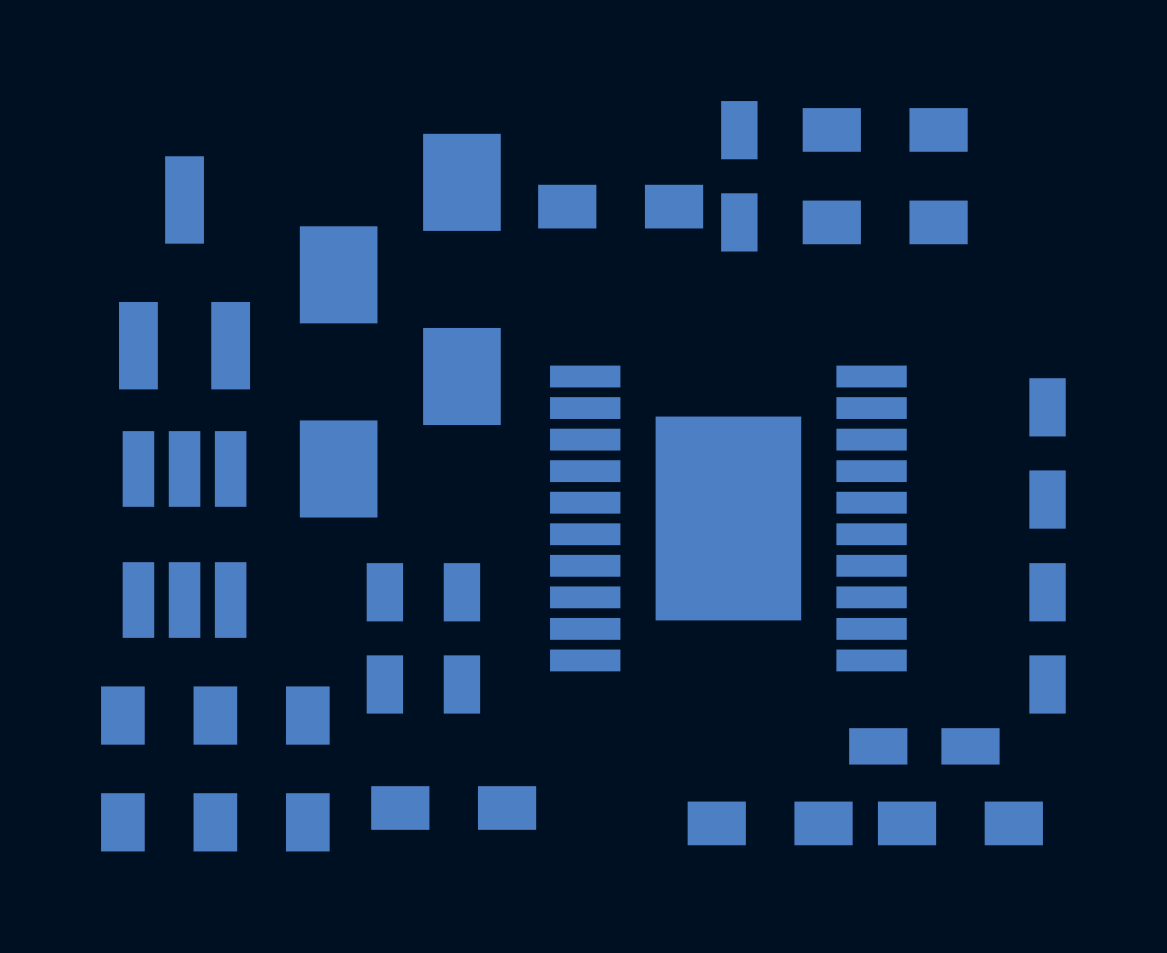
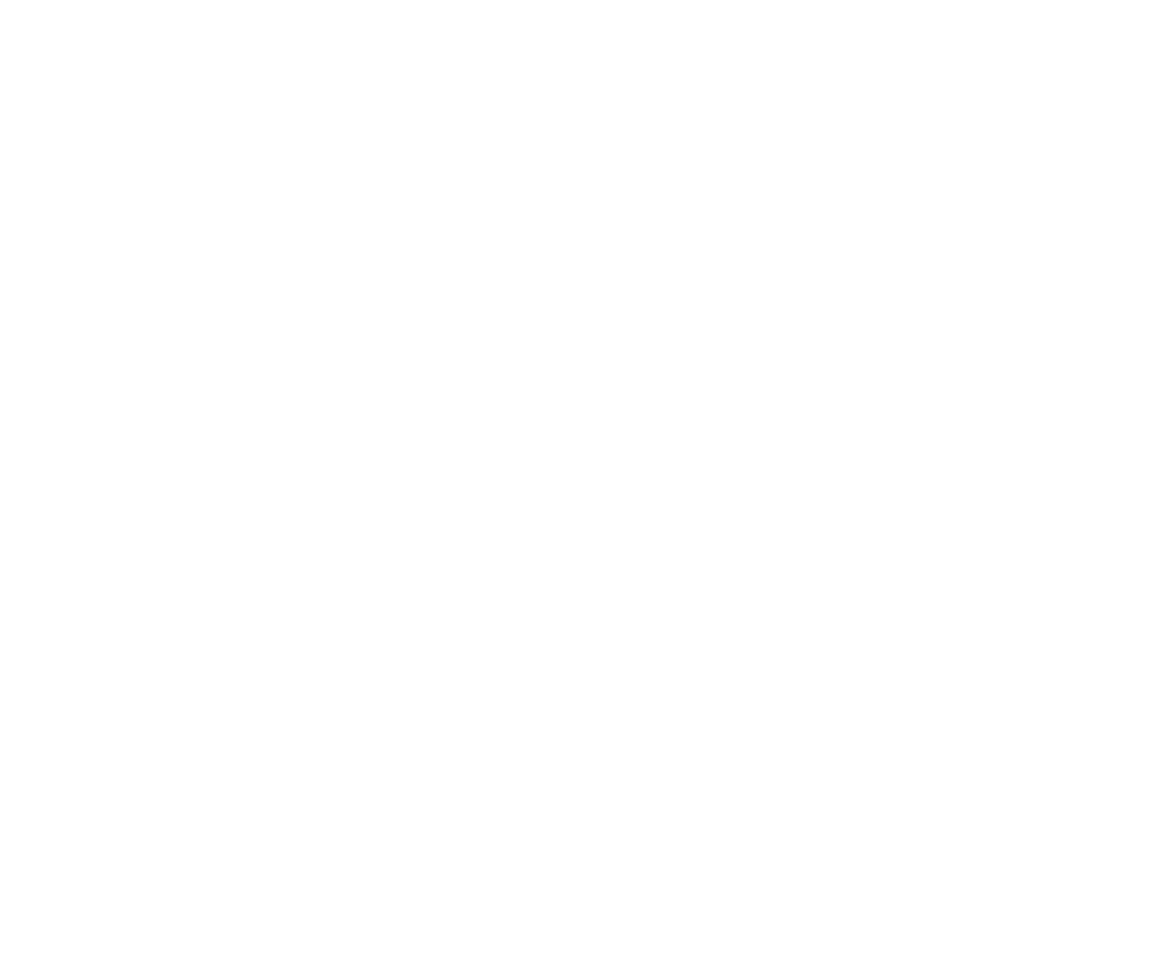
part: (885, 129) -> none
part: (739, 176) -> none
part: (620, 206) -> none
part: (885, 222) -> none
part: (184, 272) -> none
part: (461, 279) -> none
part: (338, 371) -> none
part: (1047, 453) -> none
part: (728, 518) -> none
part: (184, 534) -> none
part: (384, 638) -> none
part: (461, 638) -> none
part: (1047, 638) -> none
part: (924, 746) -> none
part: (122, 768) -> none
part: (215, 768) -> none
part: (307, 768) -> none
part: (453, 808) -> none
part: (770, 823) -> none
part: (960, 823) -> none

